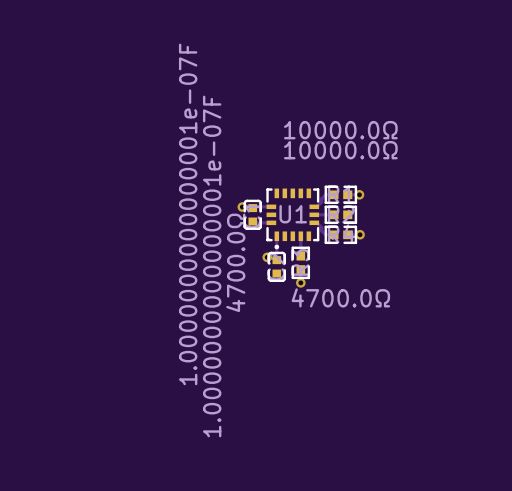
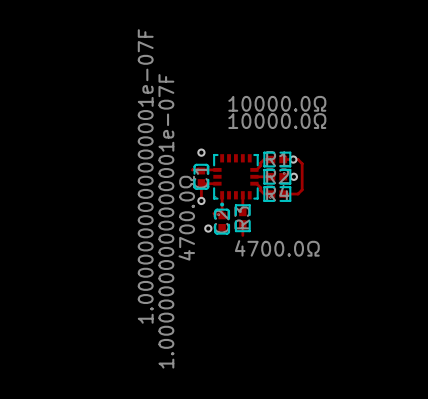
via: none -> (201, 152)
track: none -> (293, 159) (298, 159) (302, 163) (302, 189) (298, 194) (293, 194)
via: (242, 207) -> none
U1 name: U1 (293, 214) -> none
track: none -> (202, 183) (201, 200)
via position: (360, 234) -> (293, 176)
via: none -> (201, 200)
via: (267, 257) -> none
via: none -> (208, 228)
via: (300, 282) -> none

